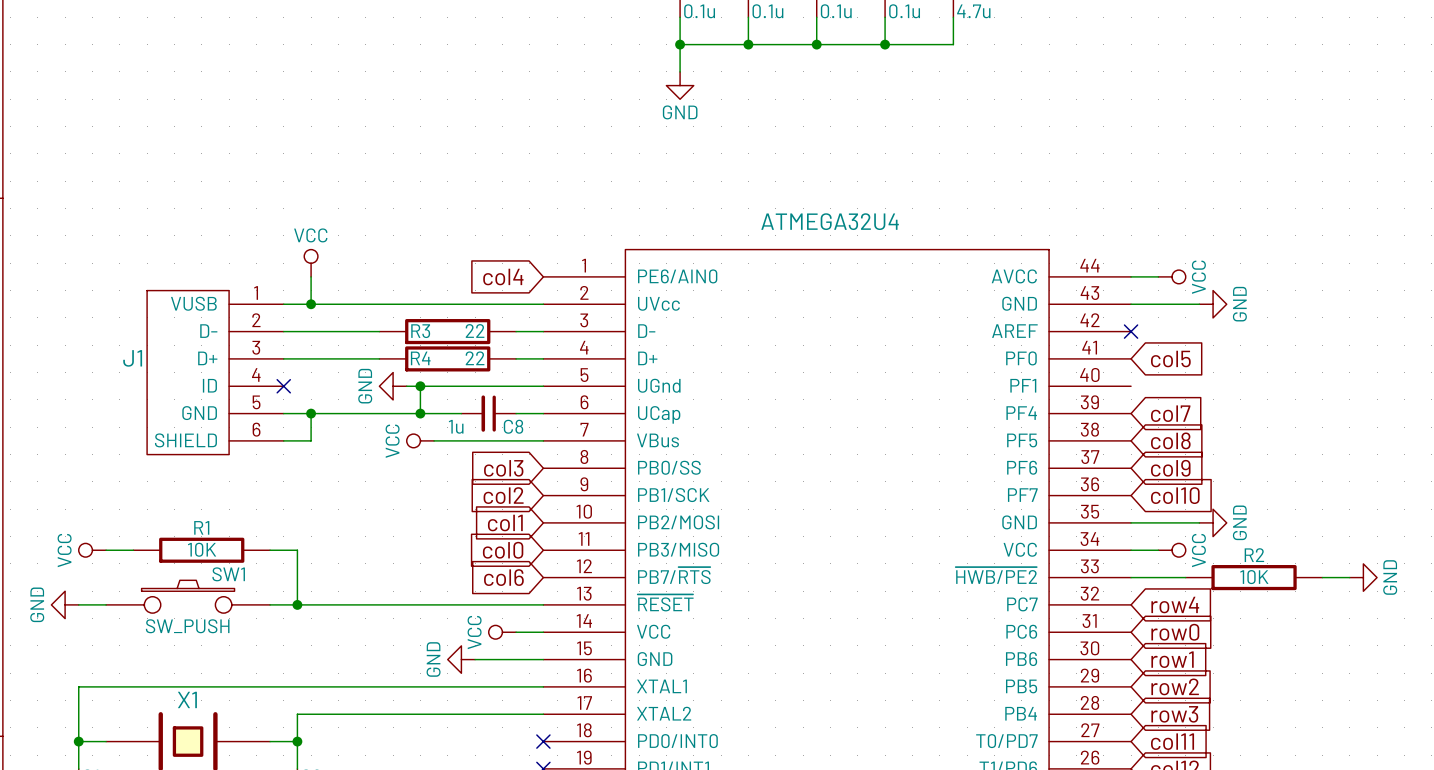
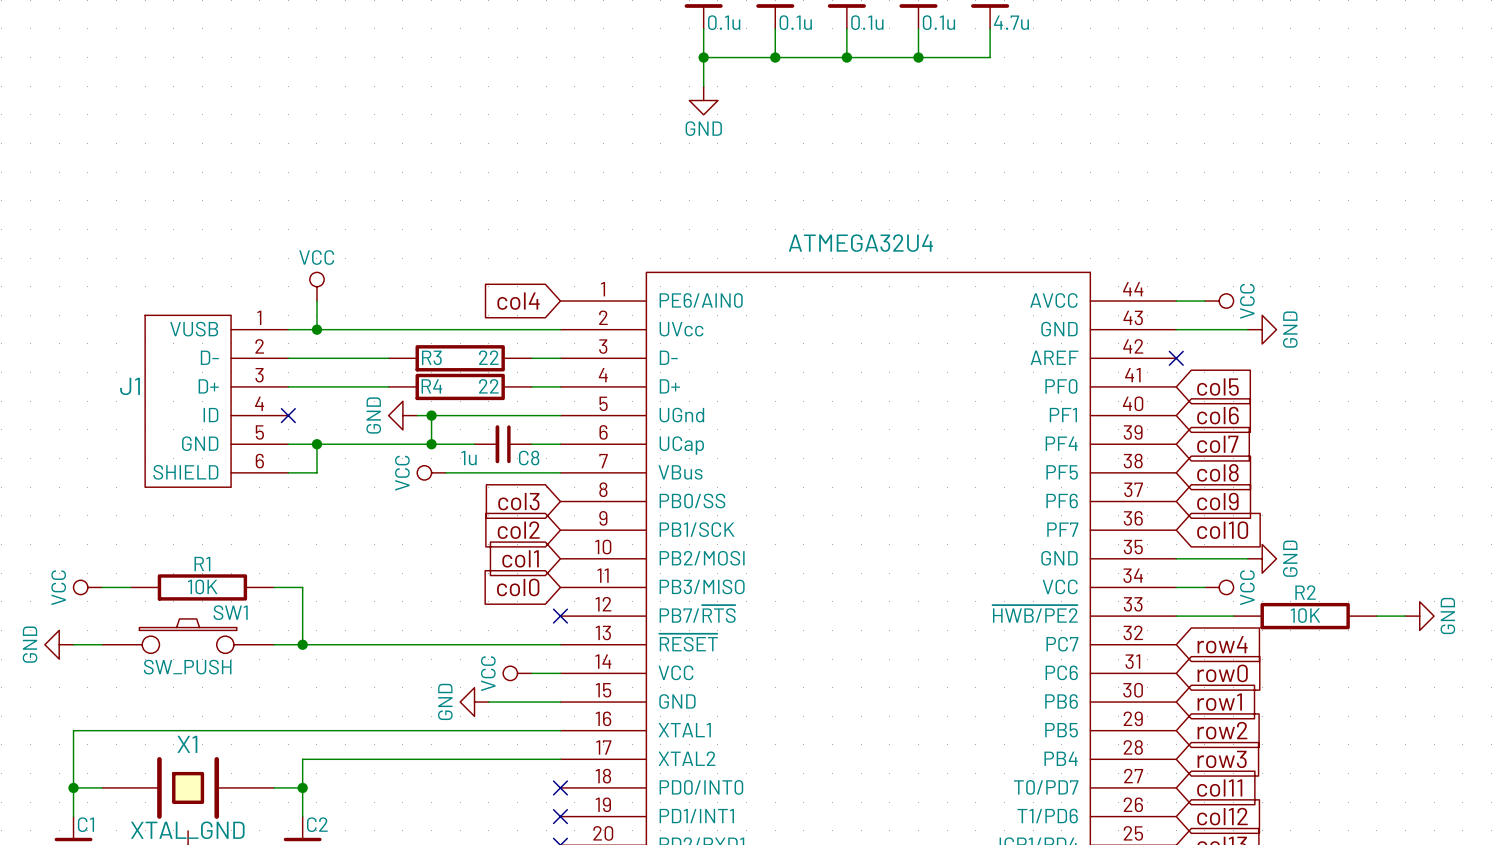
global label: none -> col6 (1218, 415)
global label: col6 (503, 577) -> none
no-connect mark: none -> (560, 616)

